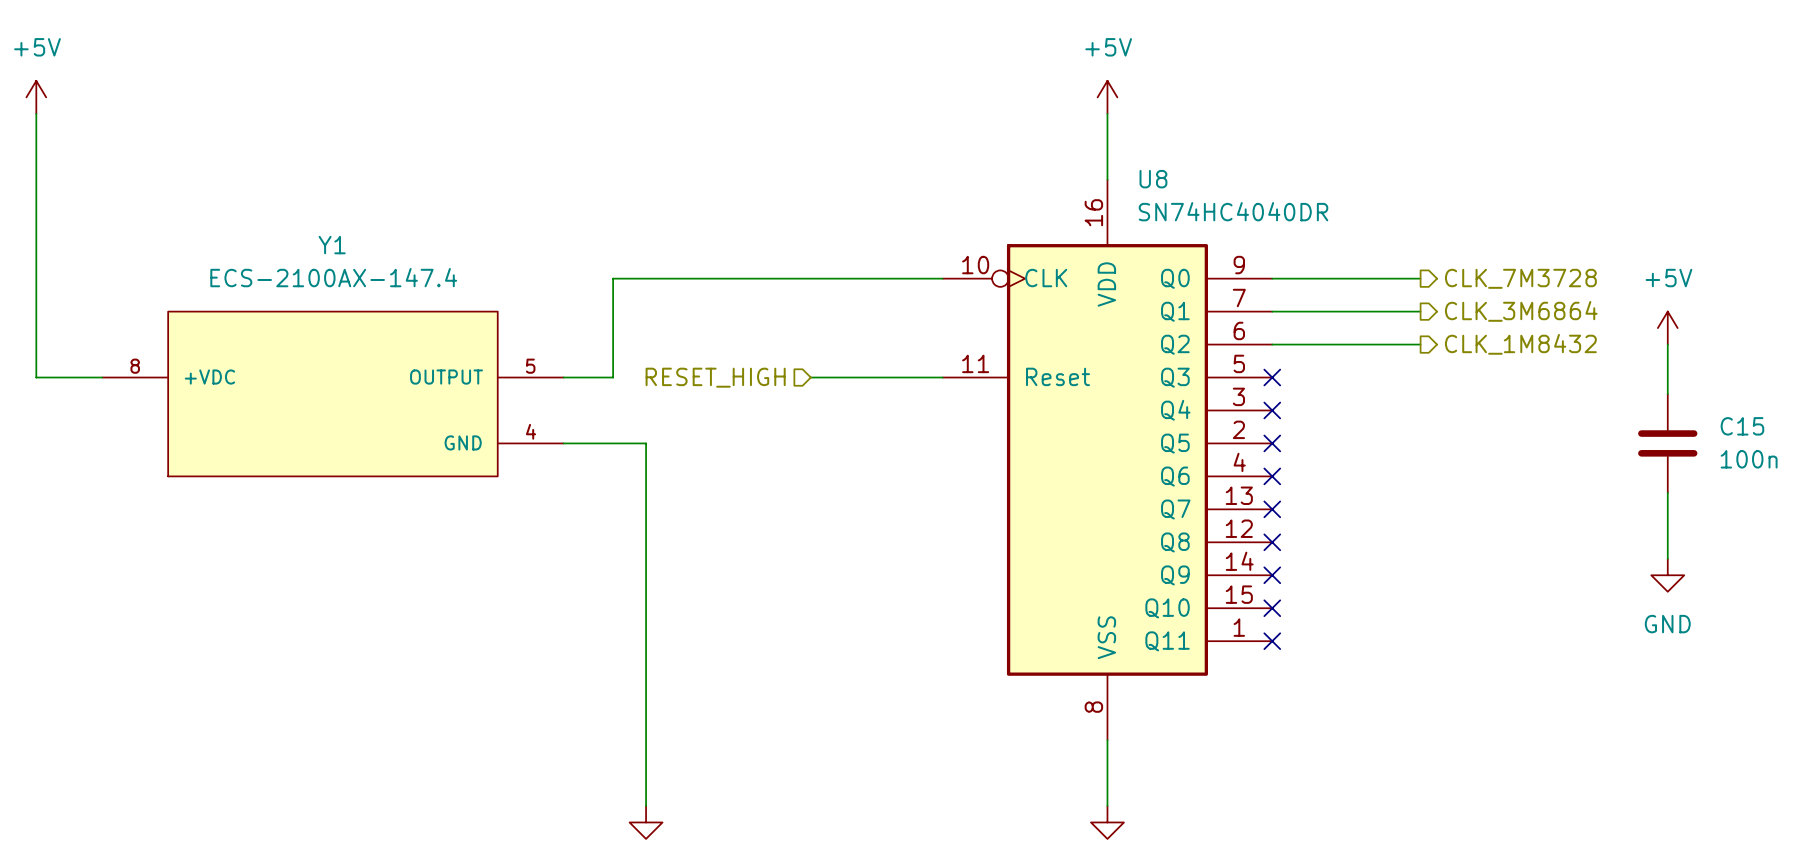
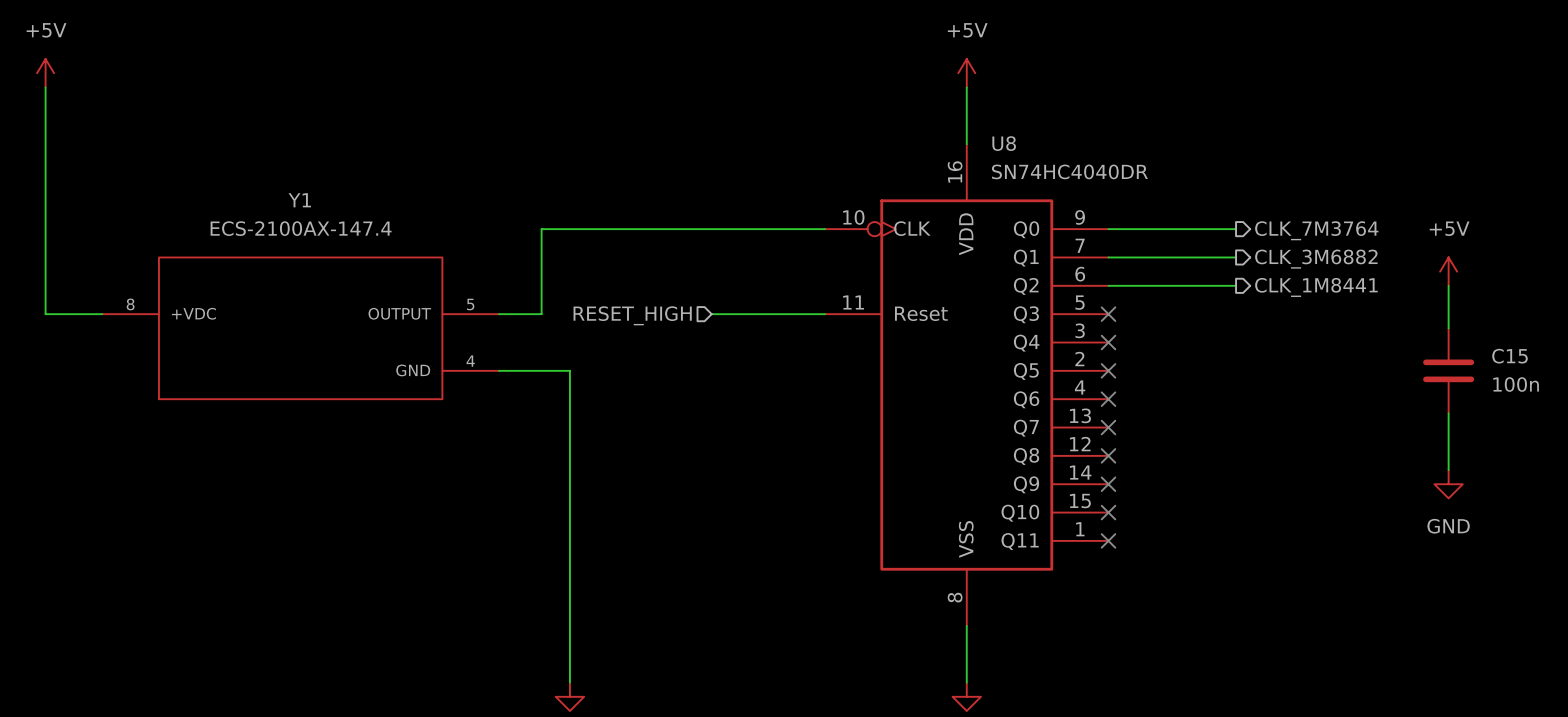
hierarchical label: CLK_7M3728 (1520, 278) -> CLK_7M3764 (1316, 230)
hierarchical label: CLK_3M6864 (1521, 311) -> CLK_3M6882 (1316, 259)
hierarchical label: CLK_1M8432 (1520, 344) -> CLK_1M8441 (1316, 287)

